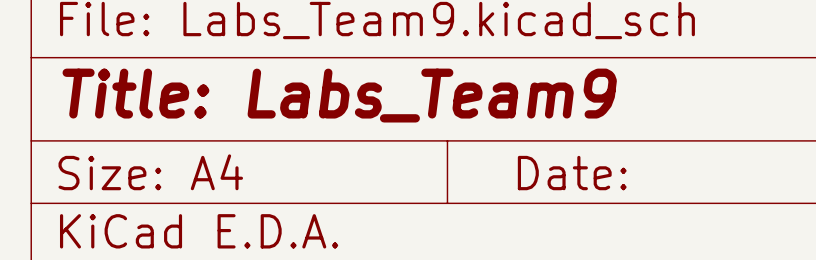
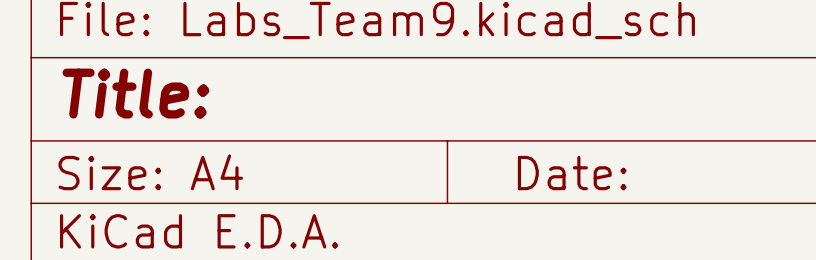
title block: Title: Labs_Team9 (339, 95) -> Title: (135, 93)

